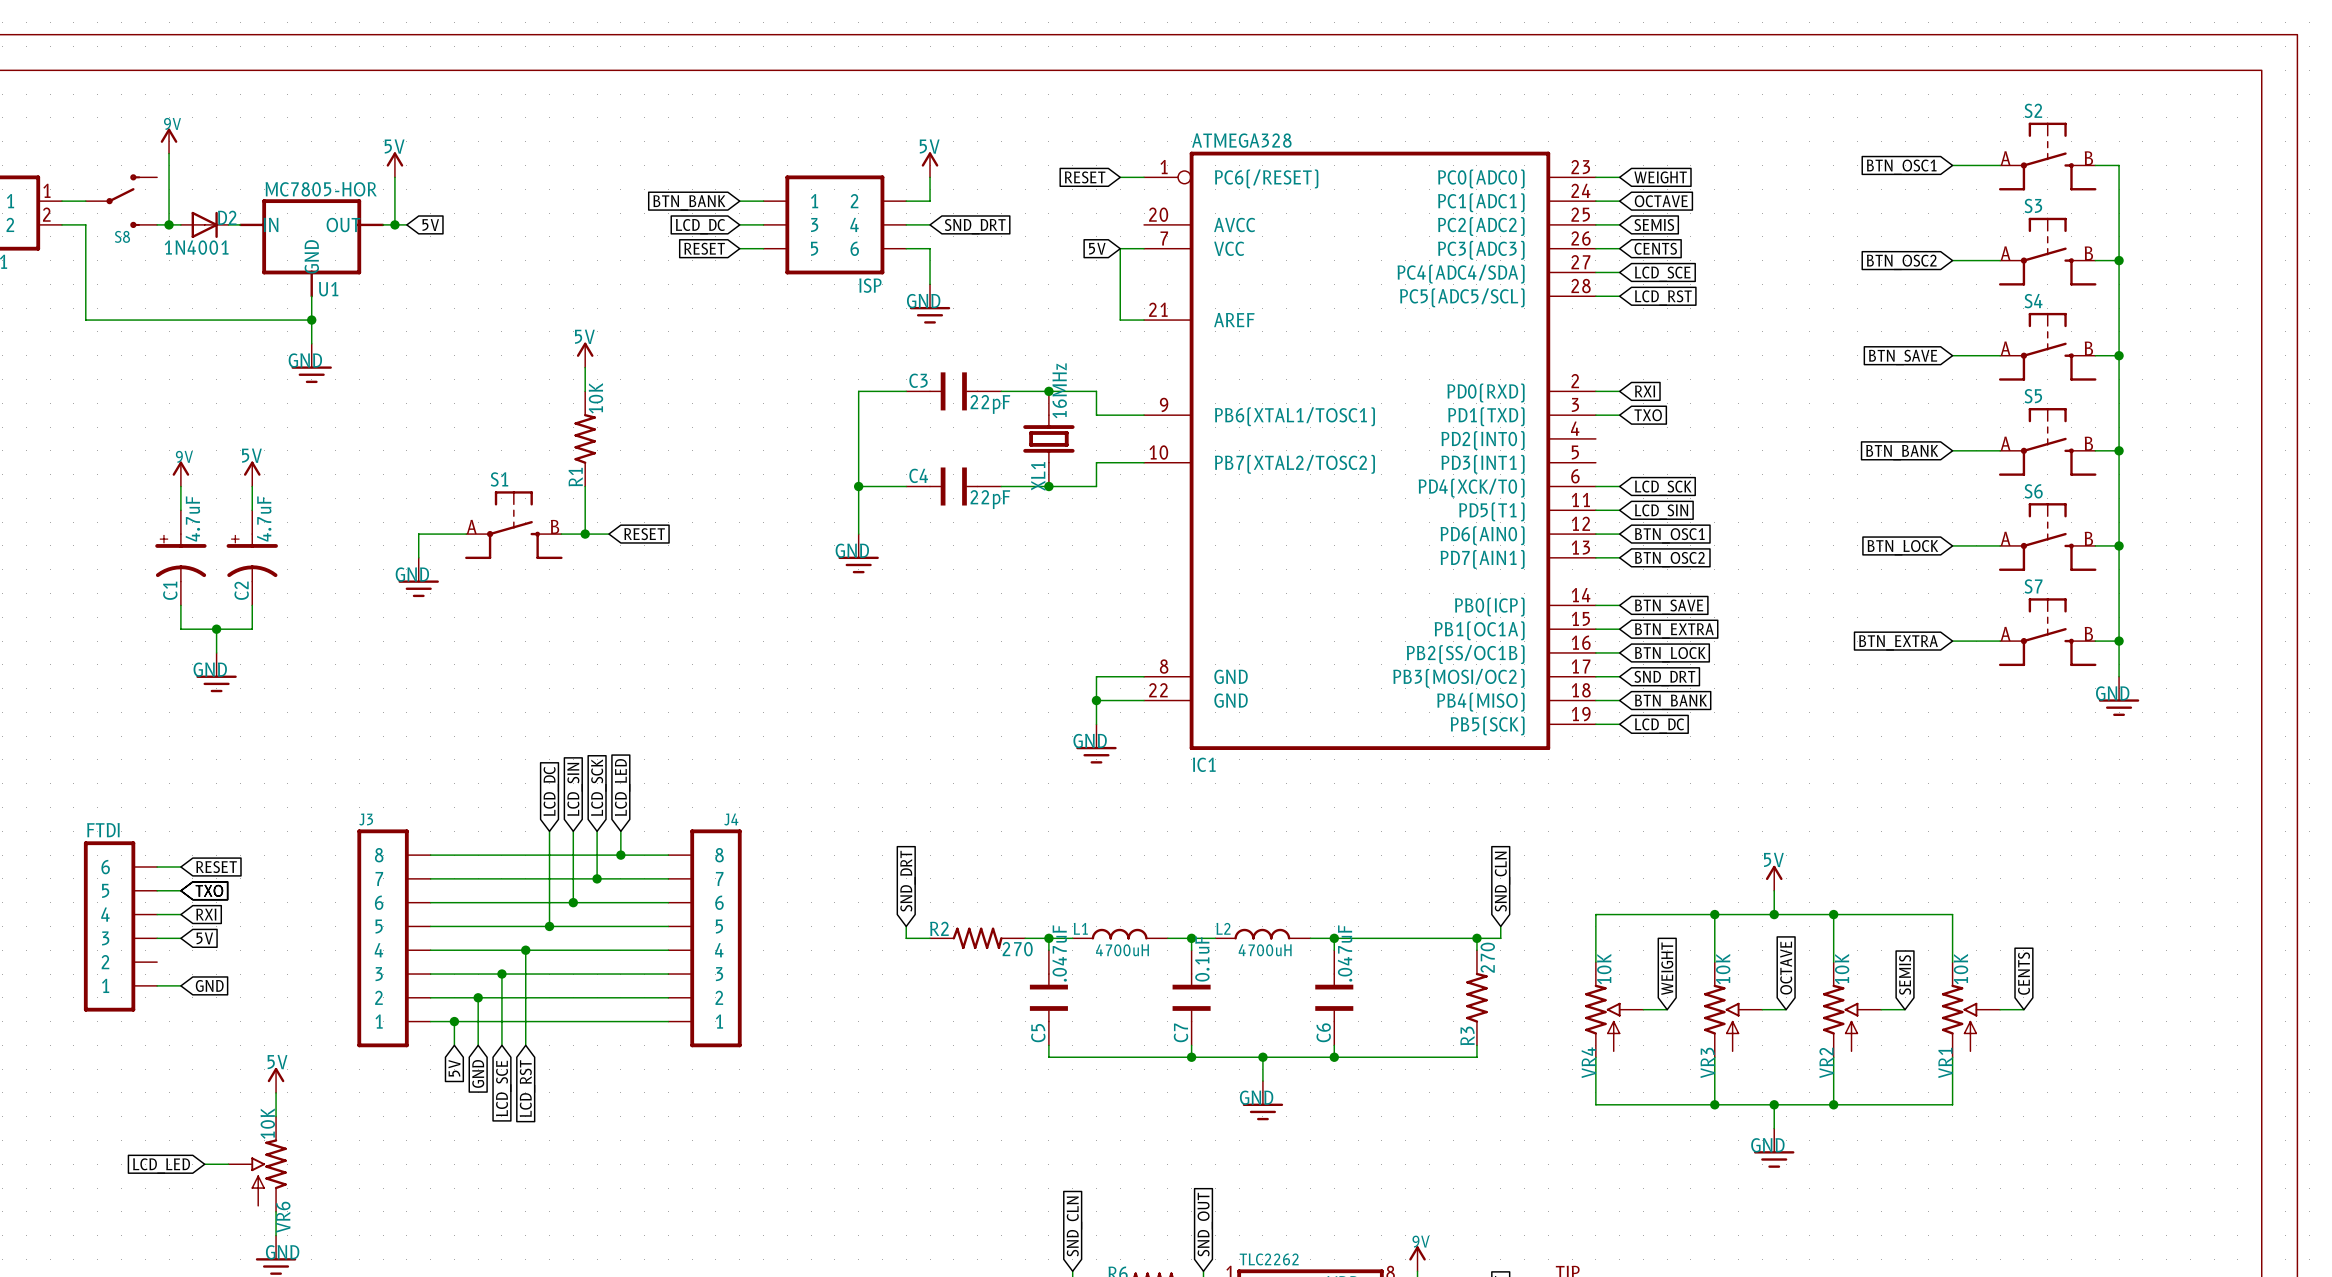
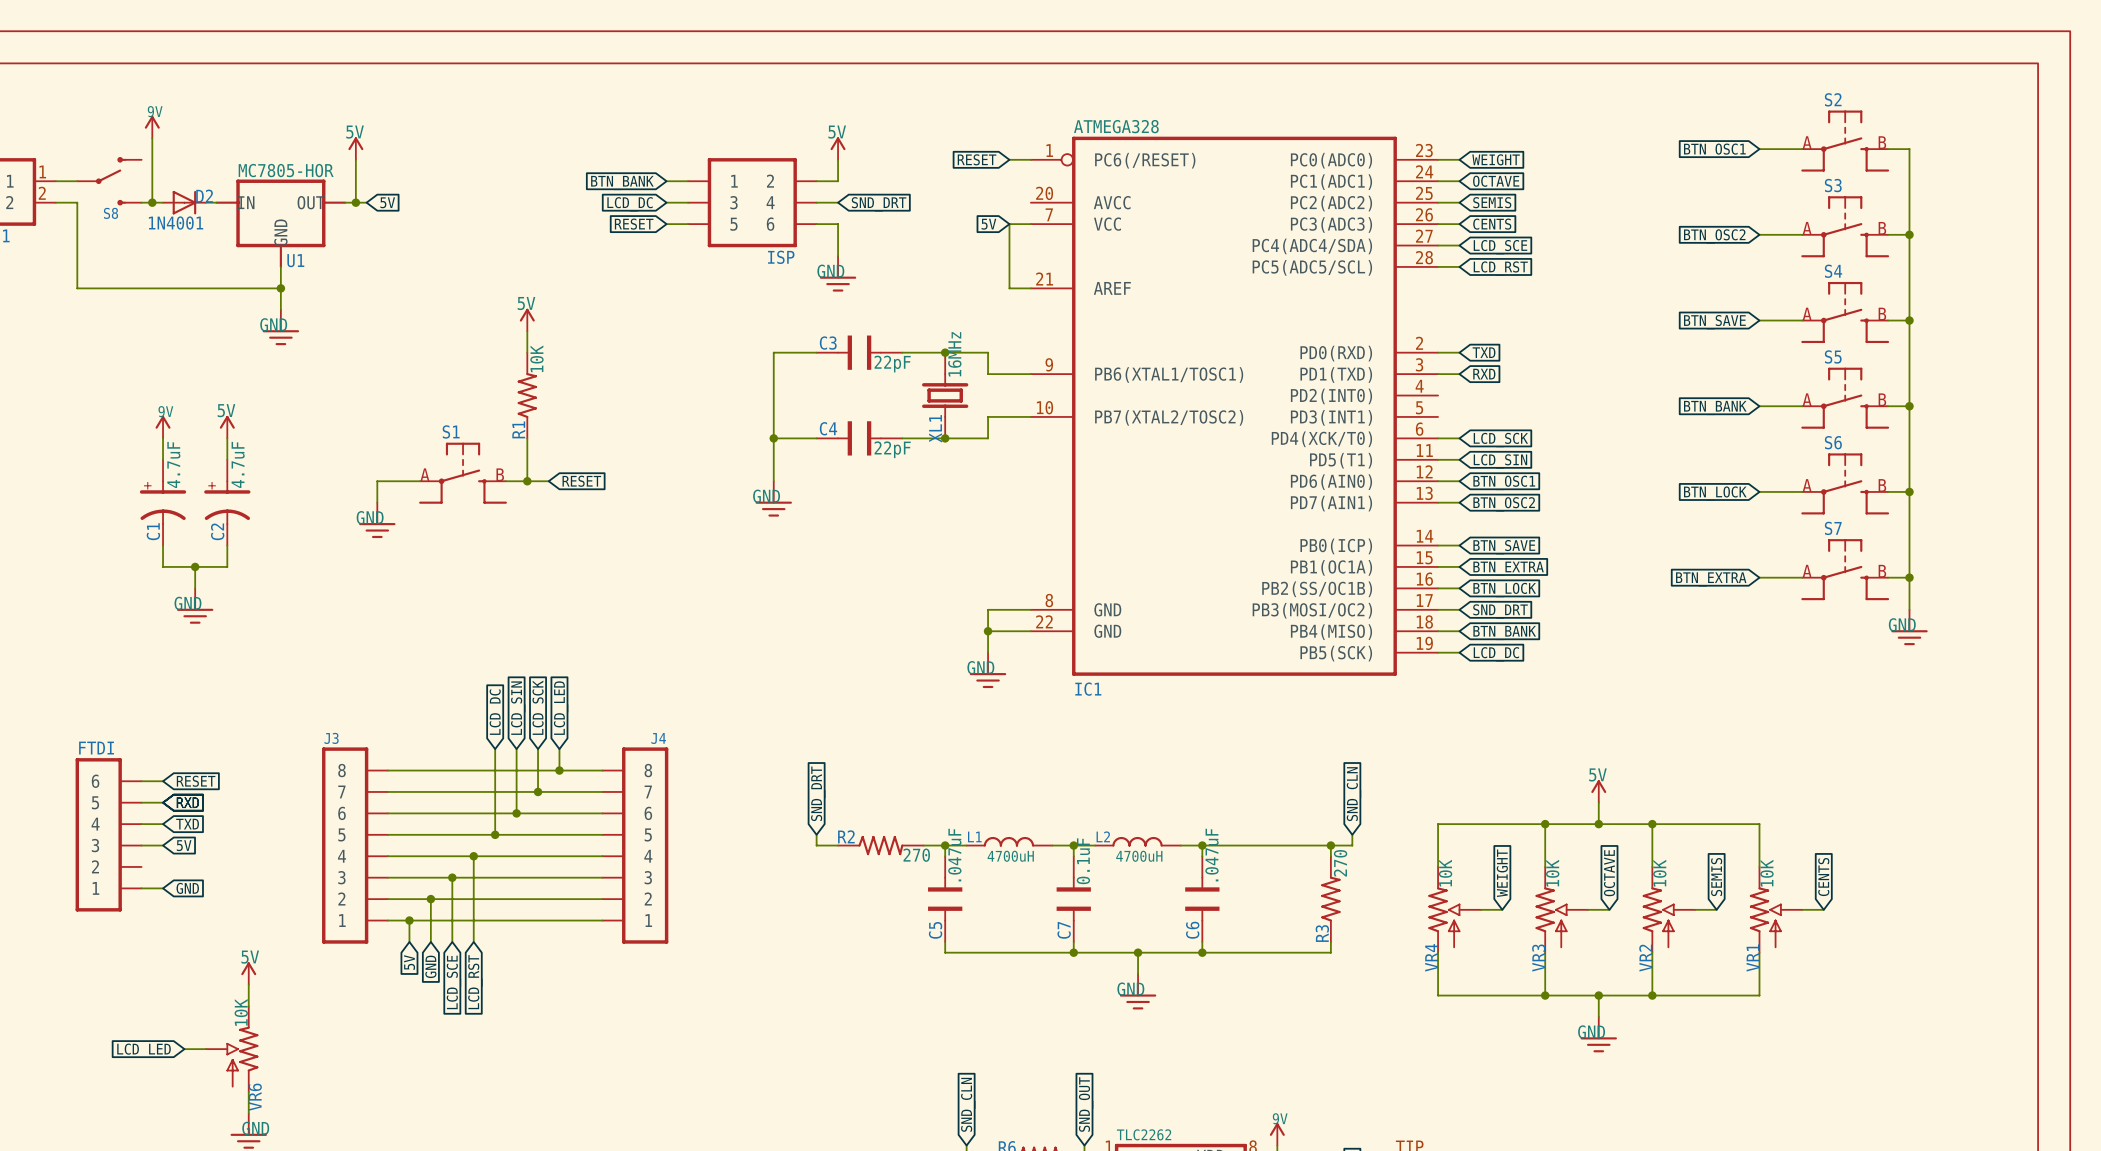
global label: RXI (1645, 391) -> TXD (1484, 352)
global label: TXO (1648, 415) -> RXD (1484, 374)
global label: TXO (209, 890) -> RXD (187, 802)
global label: RXI (206, 914) -> TXD (187, 824)

